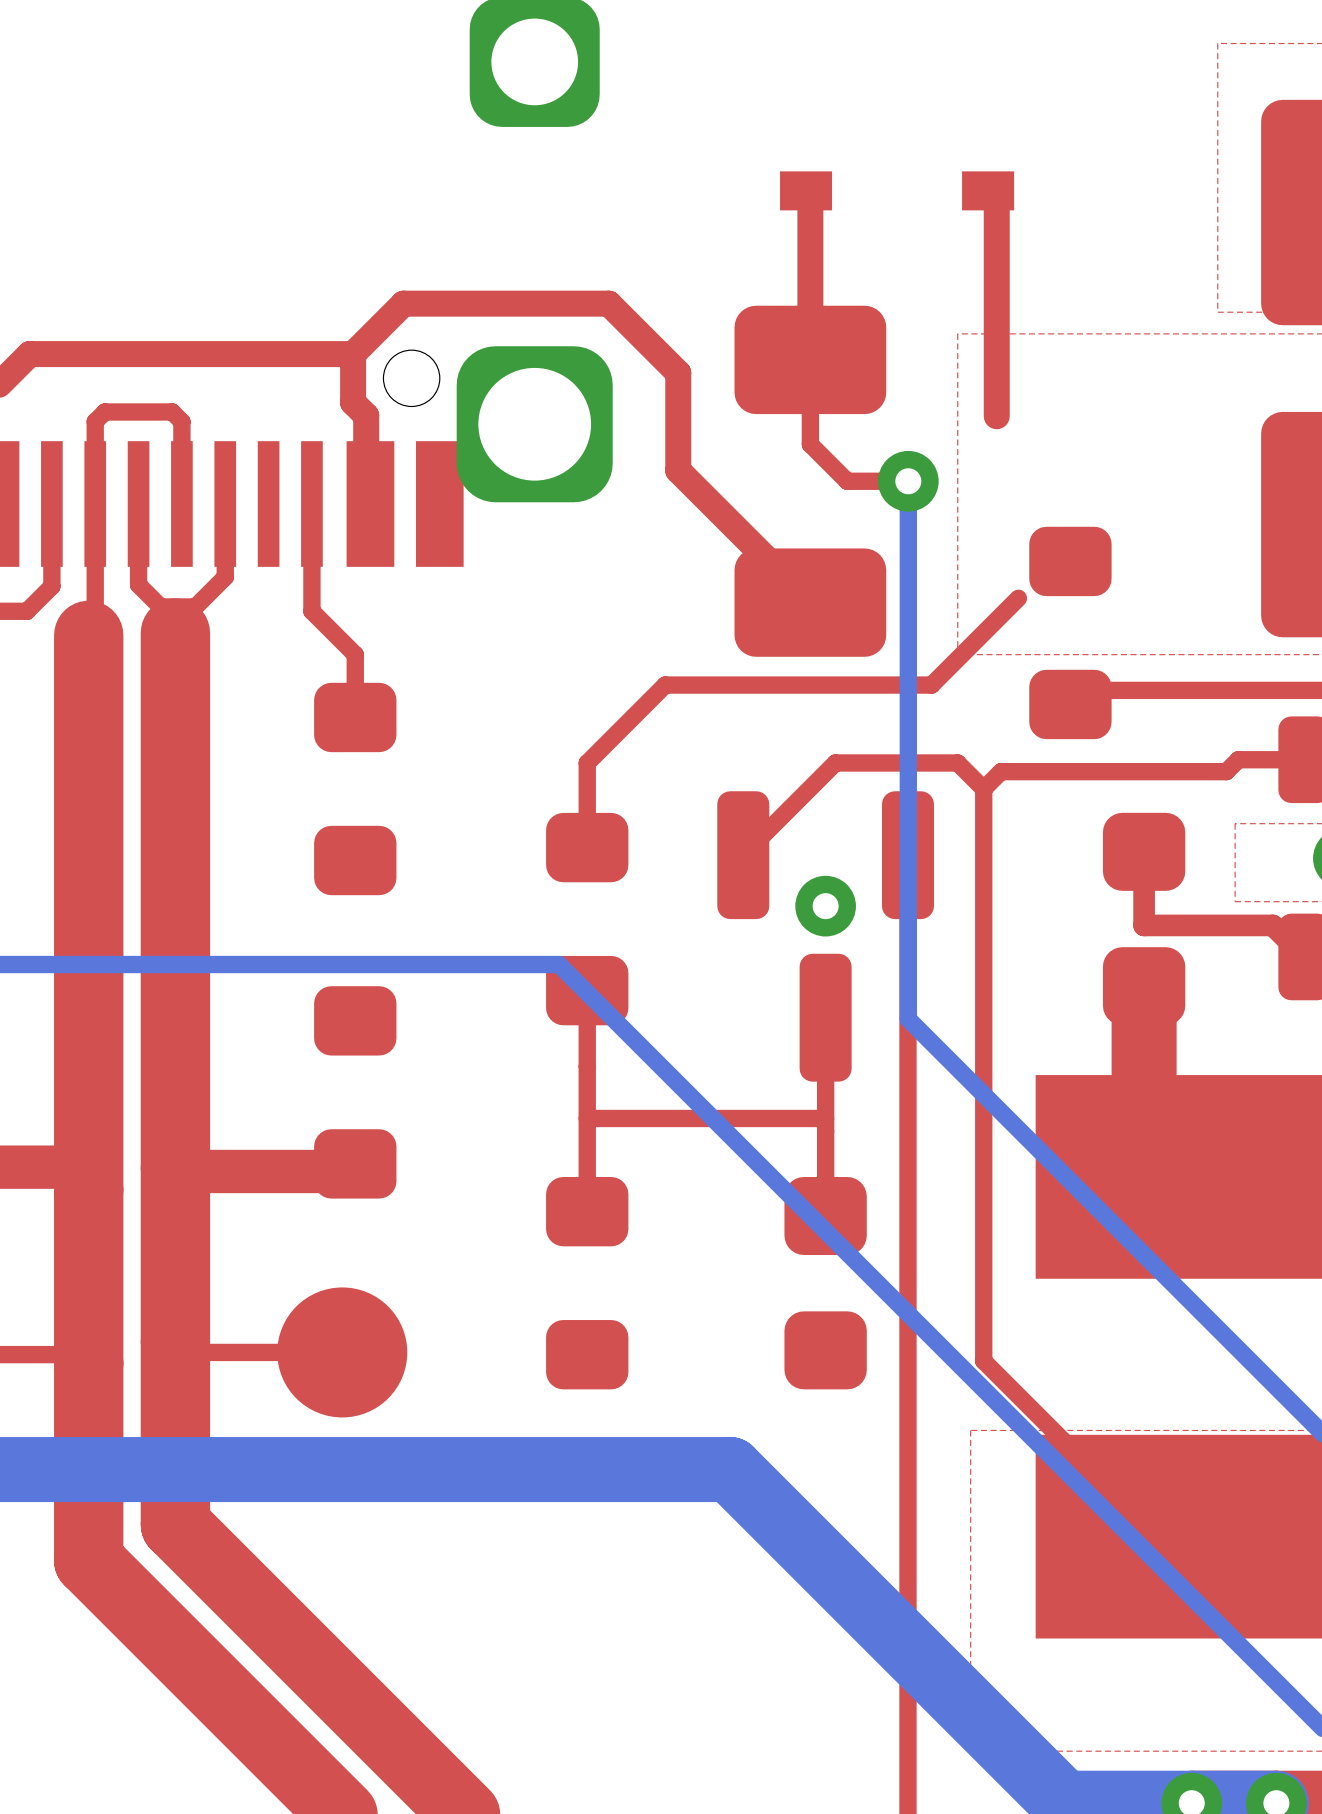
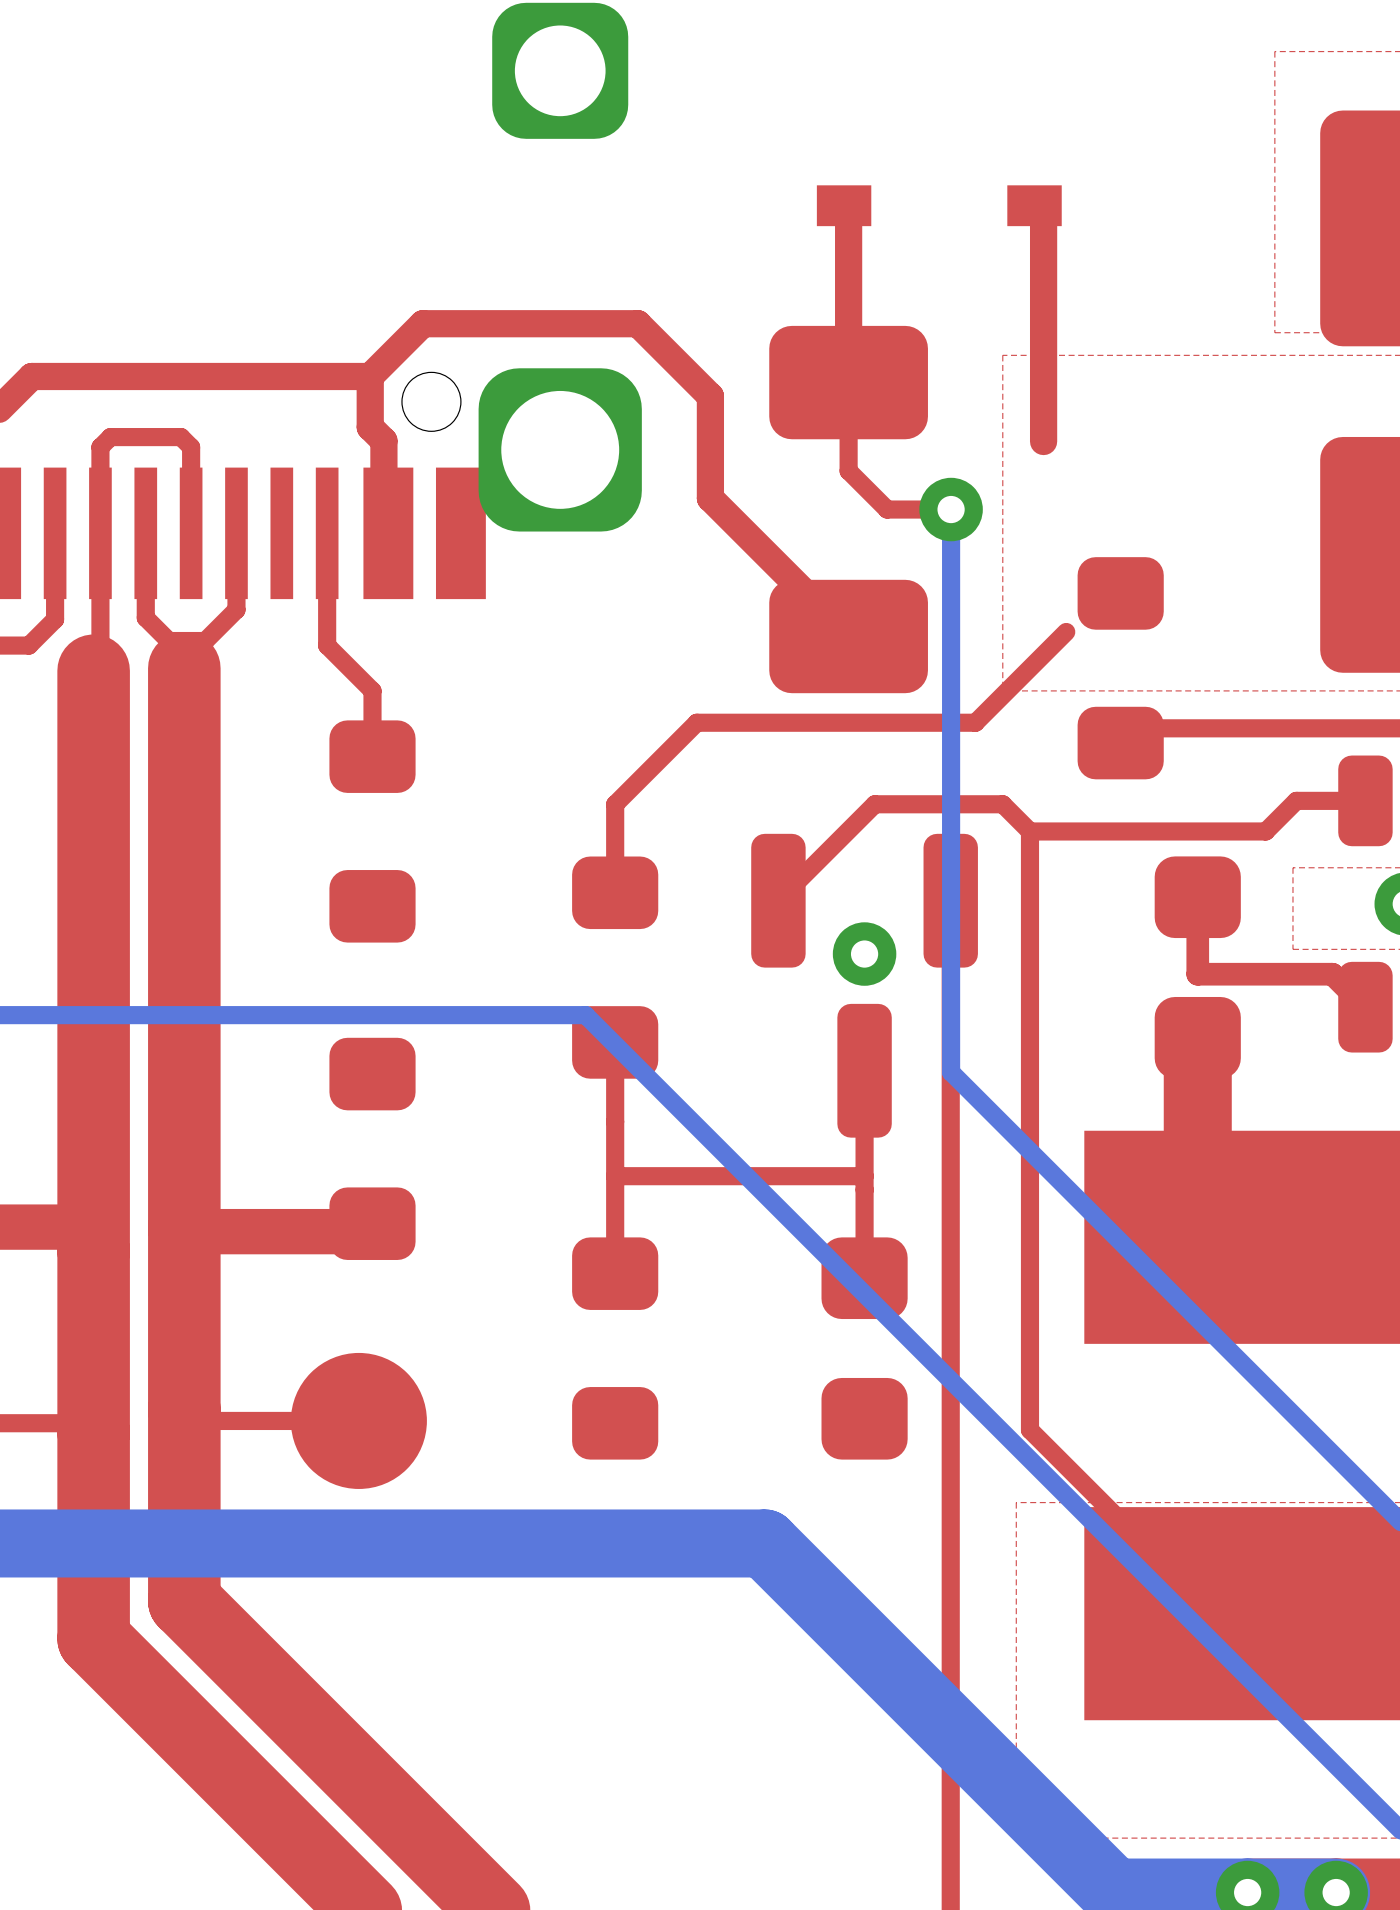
top track: (1226, 771) (1001, 771) (983, 788) -> (1283, 813) (1265, 831) (1029, 831)

